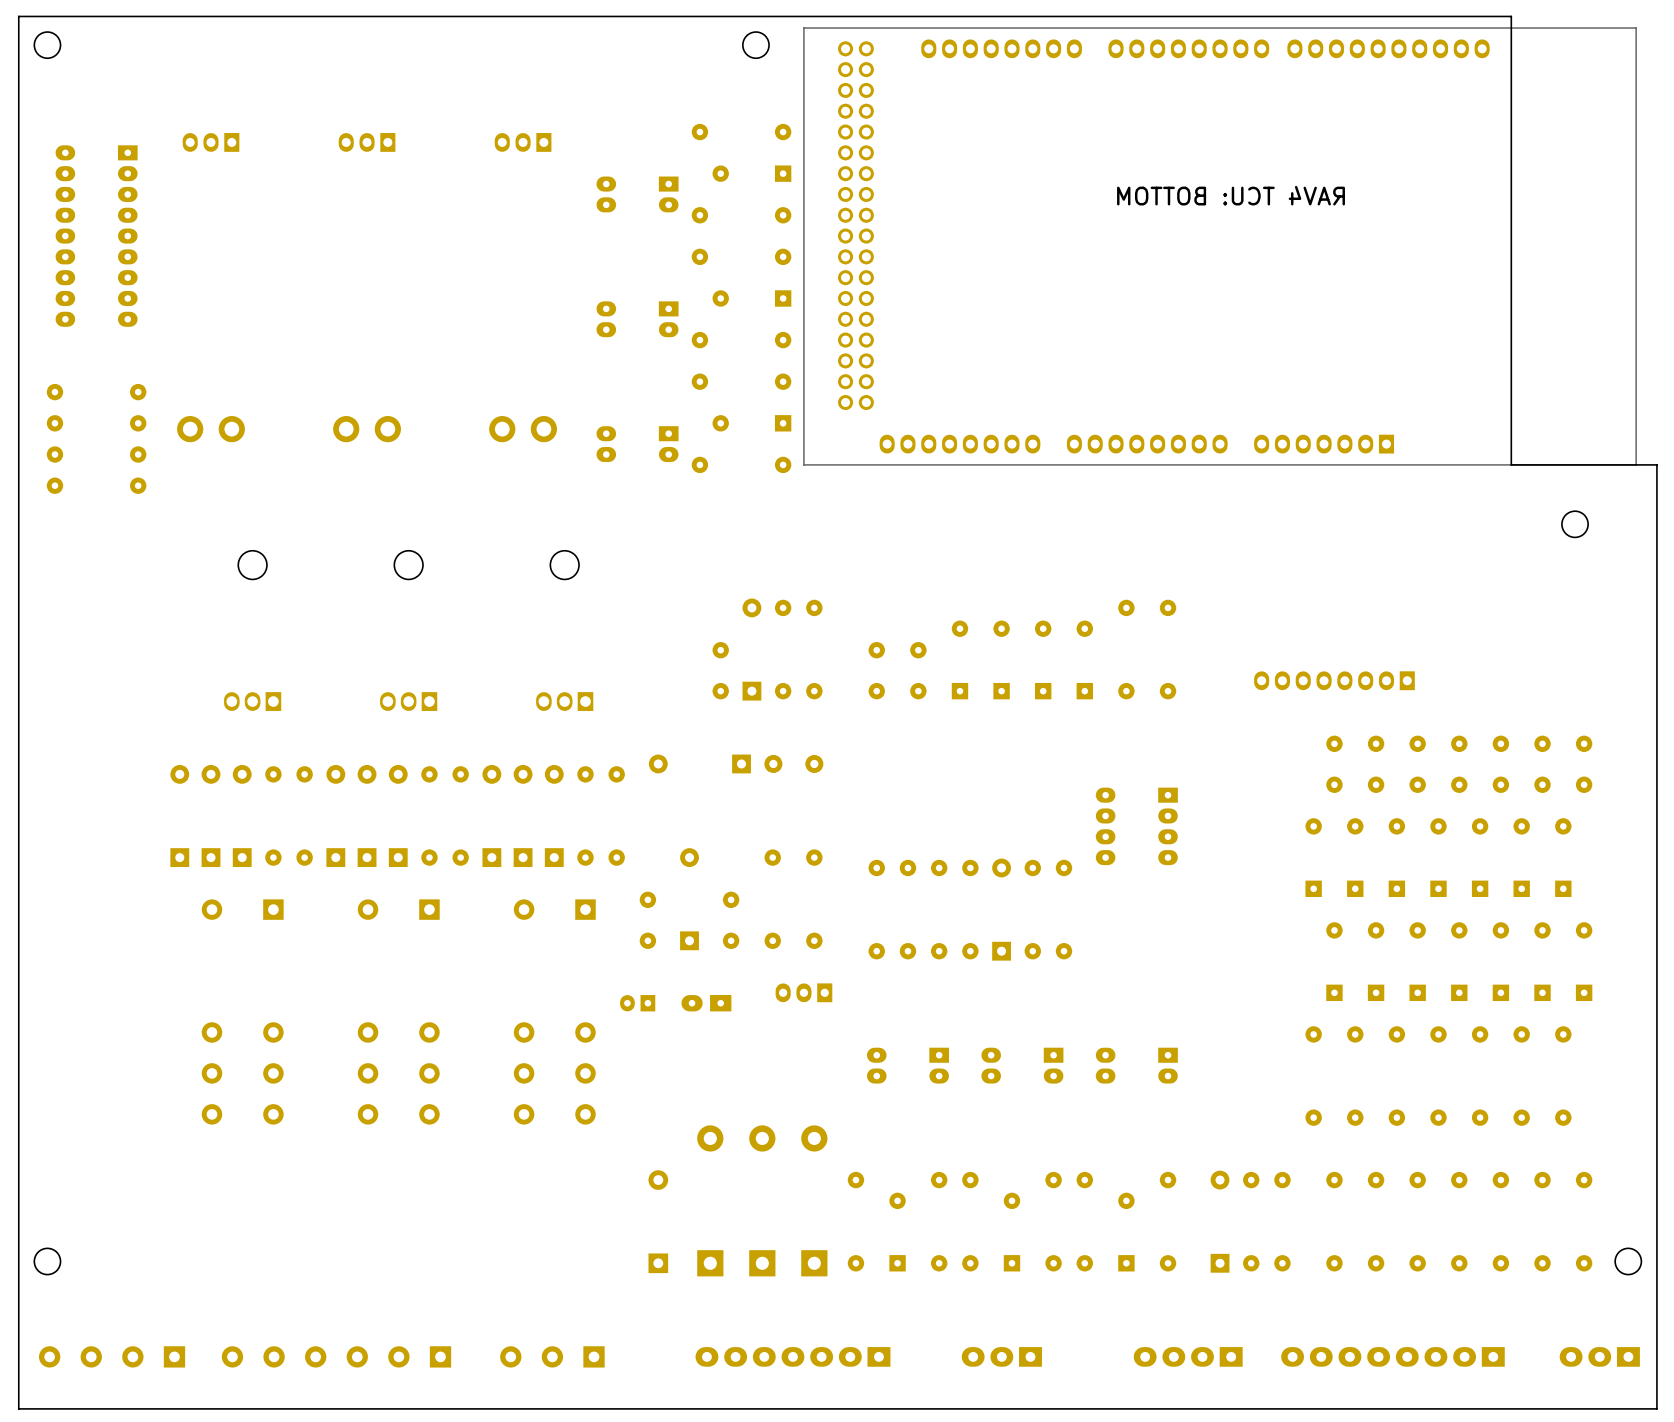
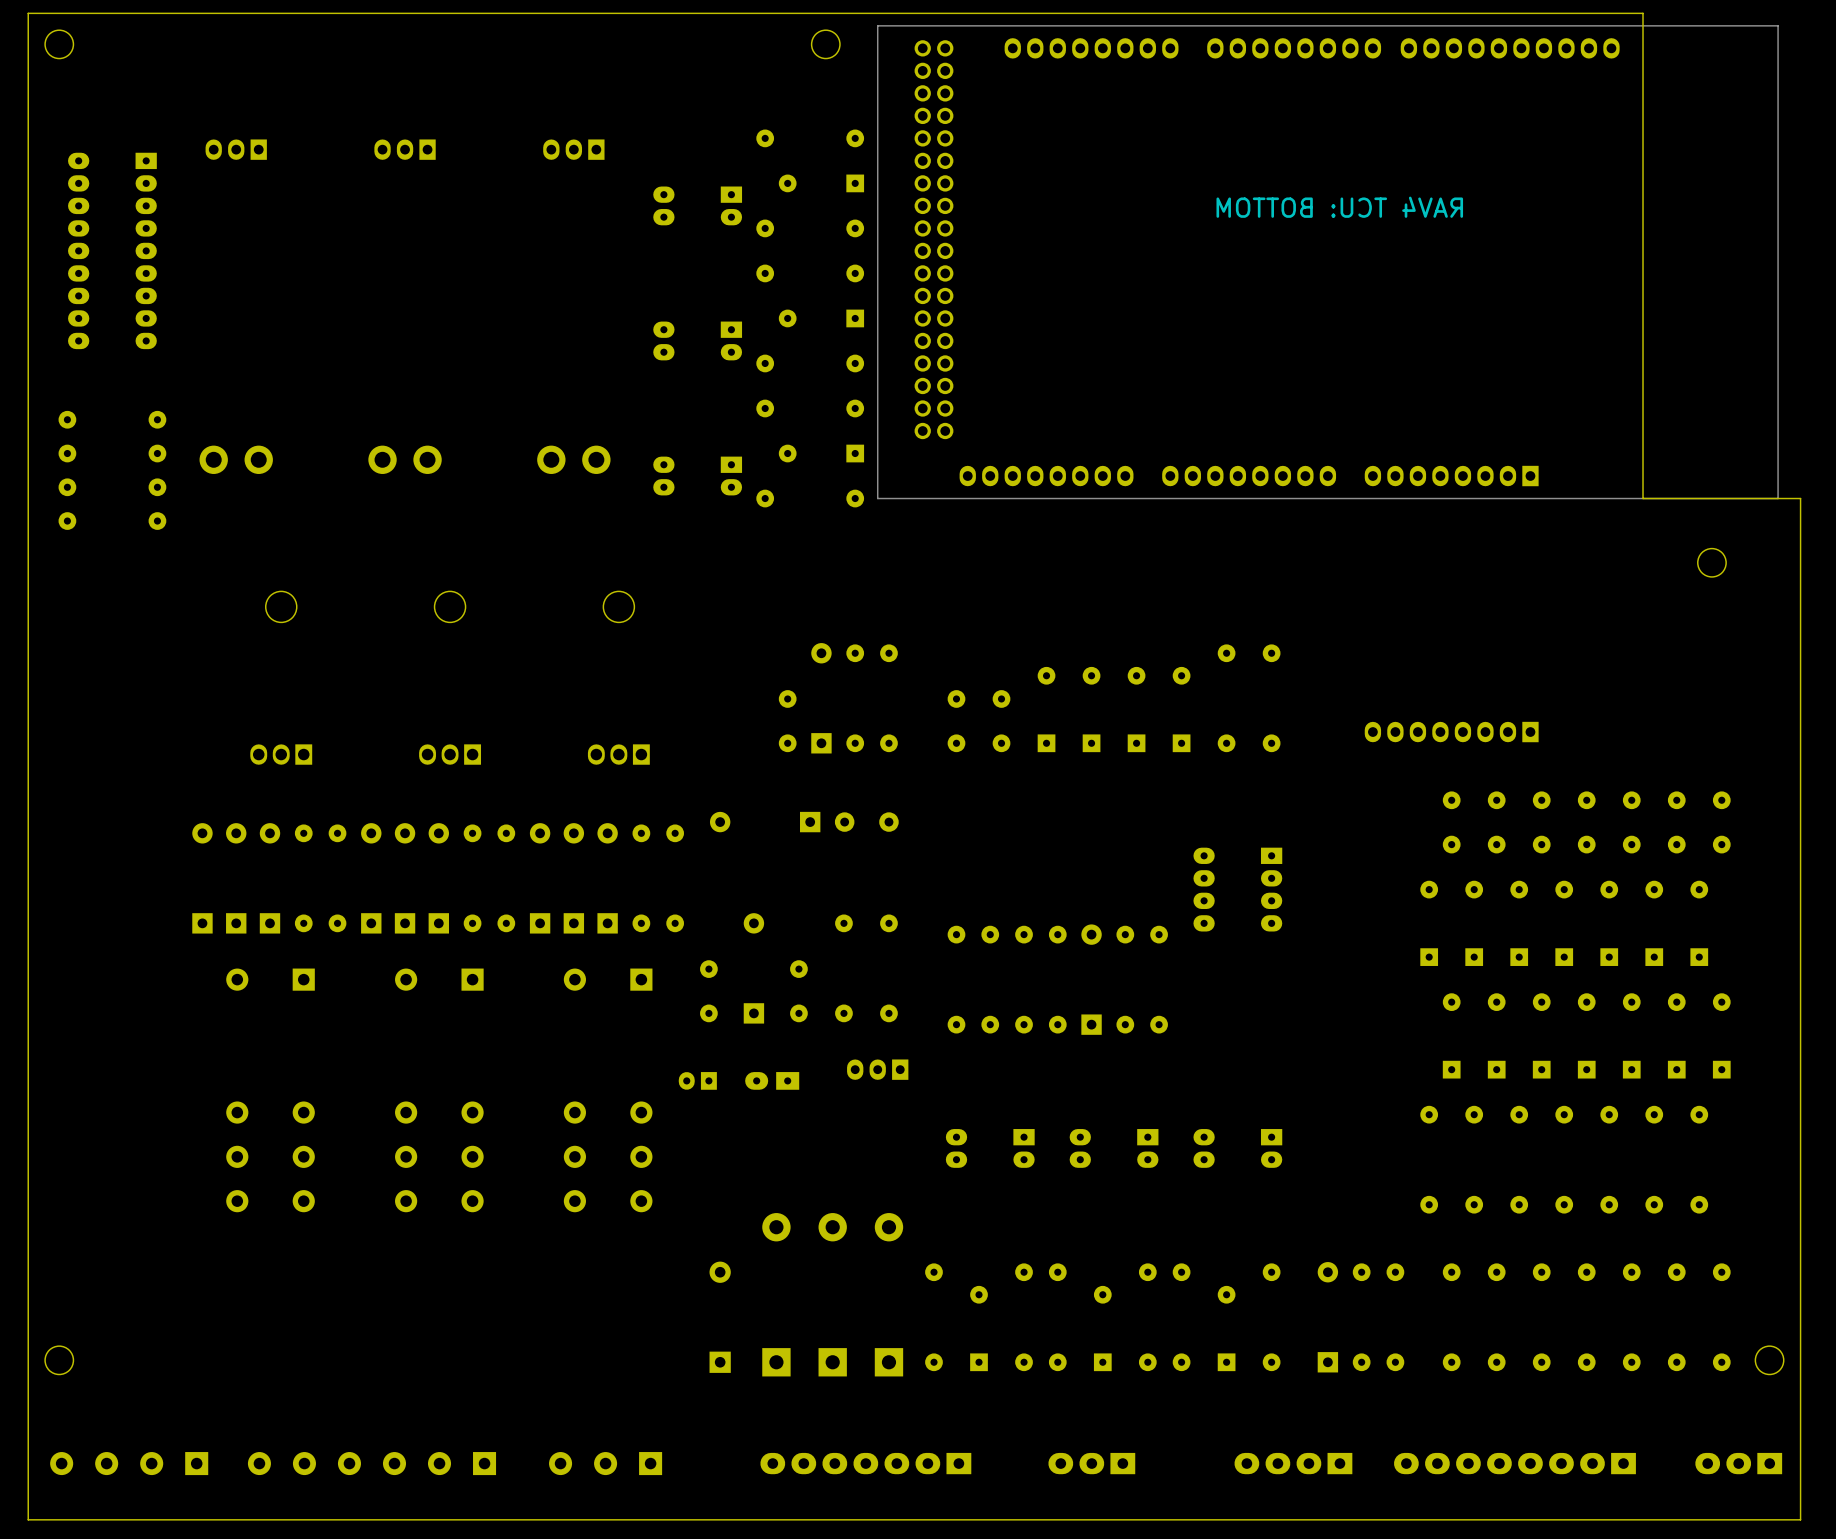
part footprint: [803, 27, 1637, 466] -> [877, 25, 1779, 499]

